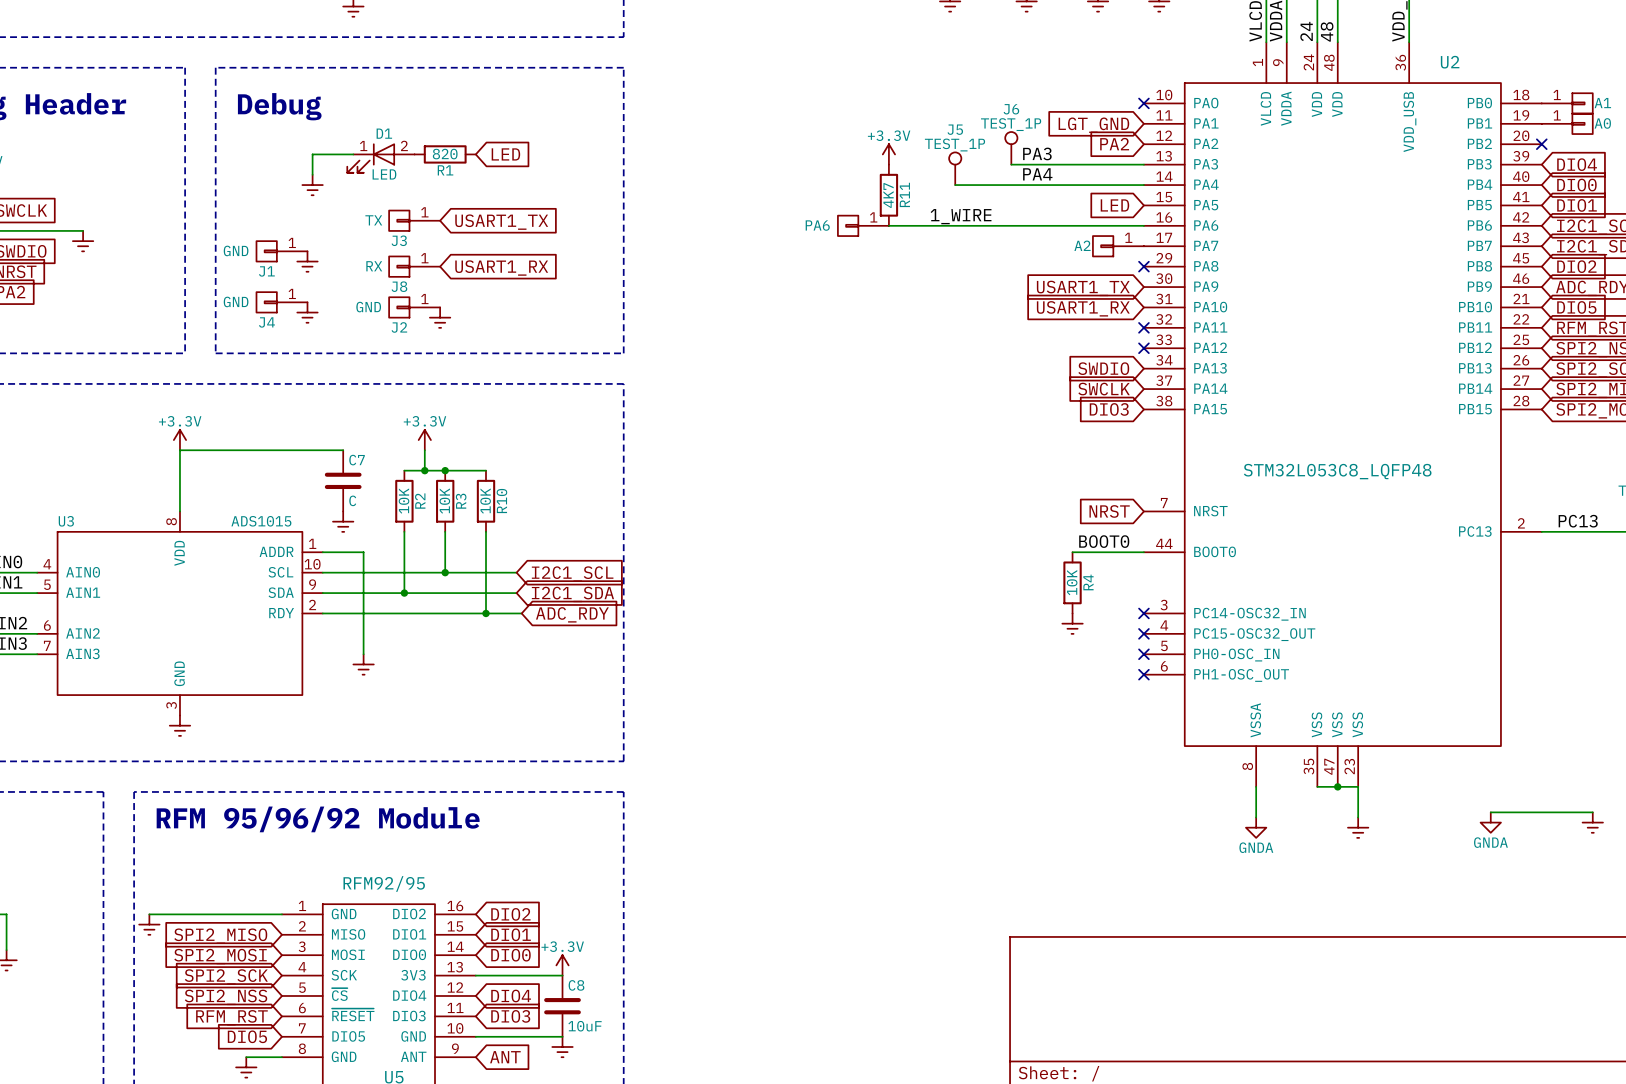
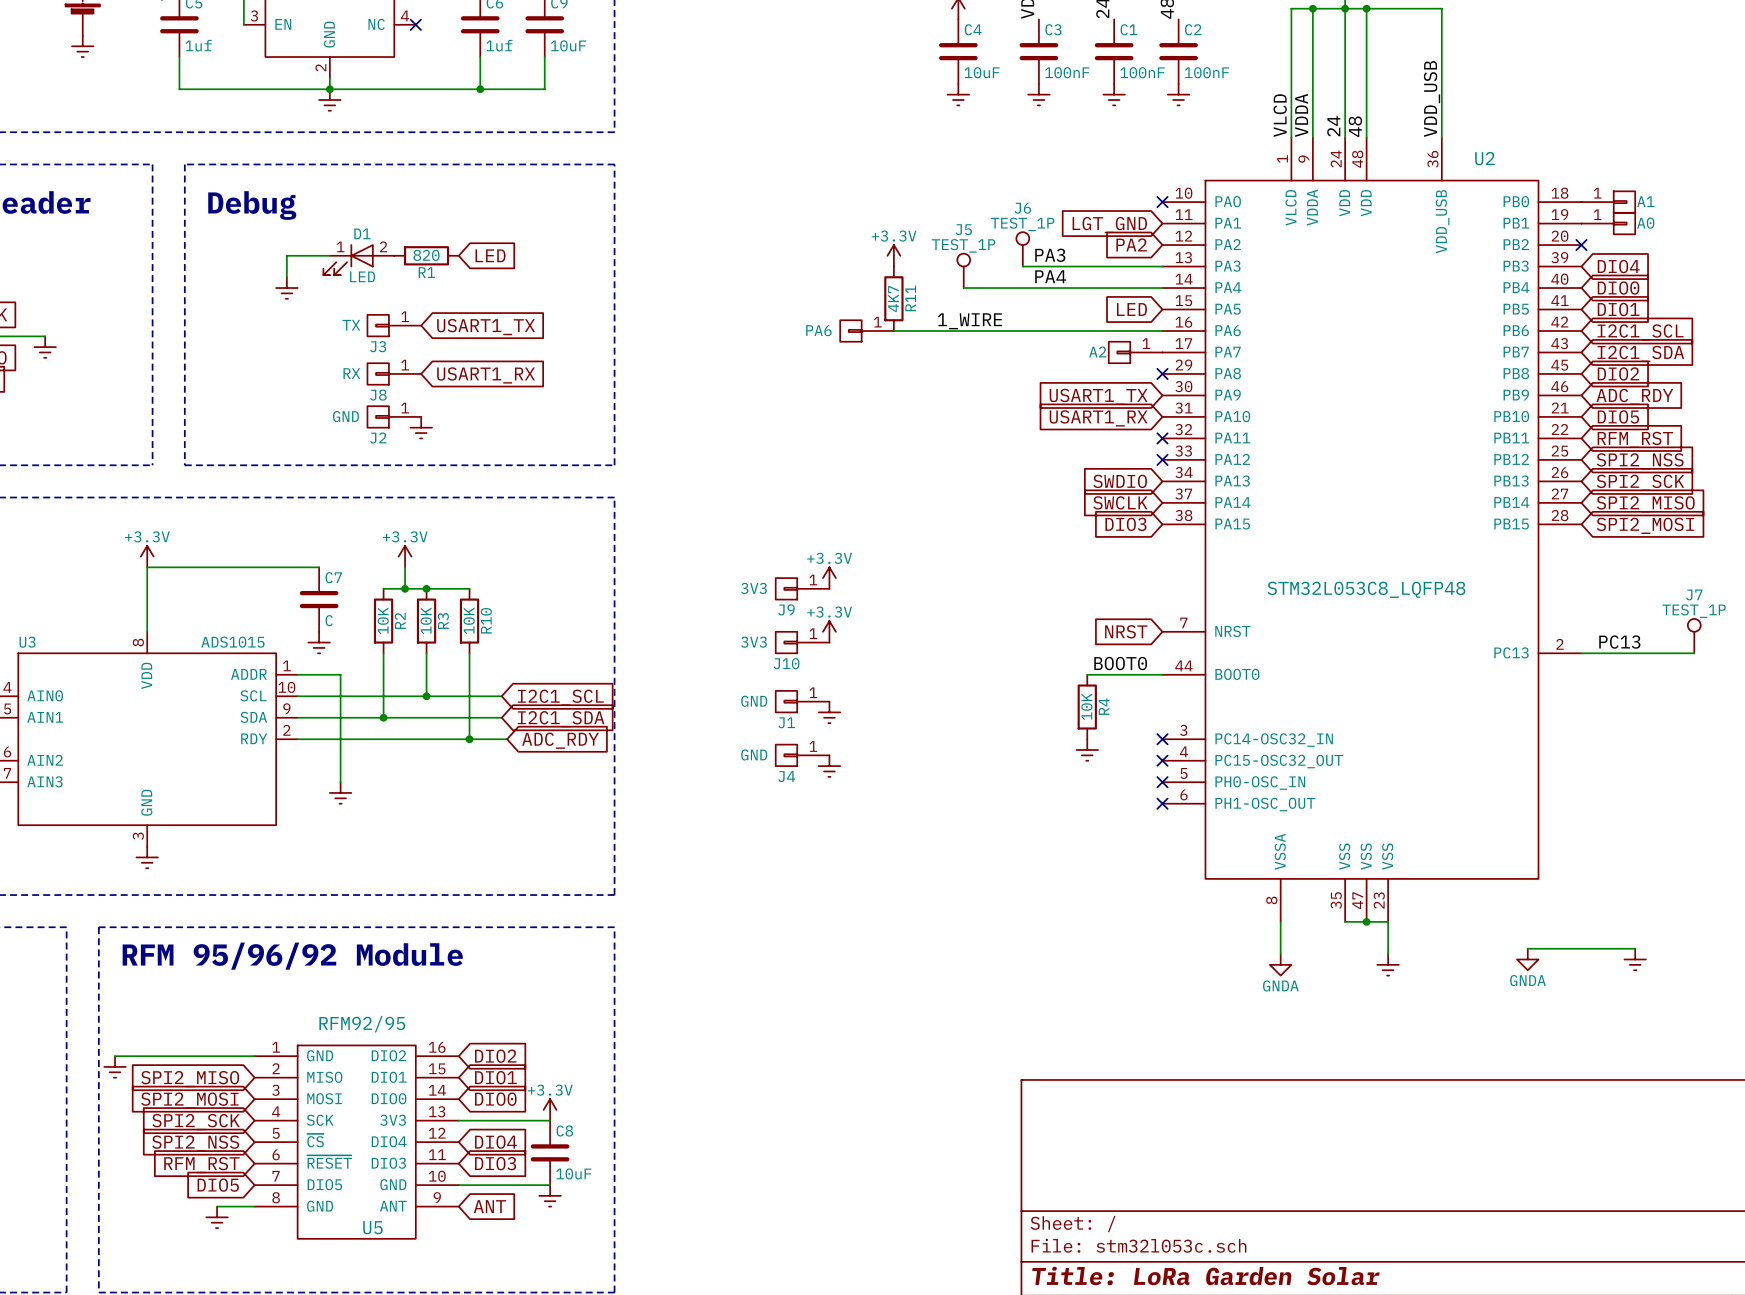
J1 position: (281, 251) -> (802, 701)
power symbol: (307, 261) -> none
J4 position: (281, 302) -> (802, 755)
power symbol: (307, 312) -> none
power symbol: none -> +3.3V (829, 578)
J9: none -> 3V3 (802, 588)
power symbol: none -> +3.3V (829, 631)
J10: none -> 3V3 (802, 642)
power symbol: none -> (829, 712)
power symbol: none -> (829, 766)

